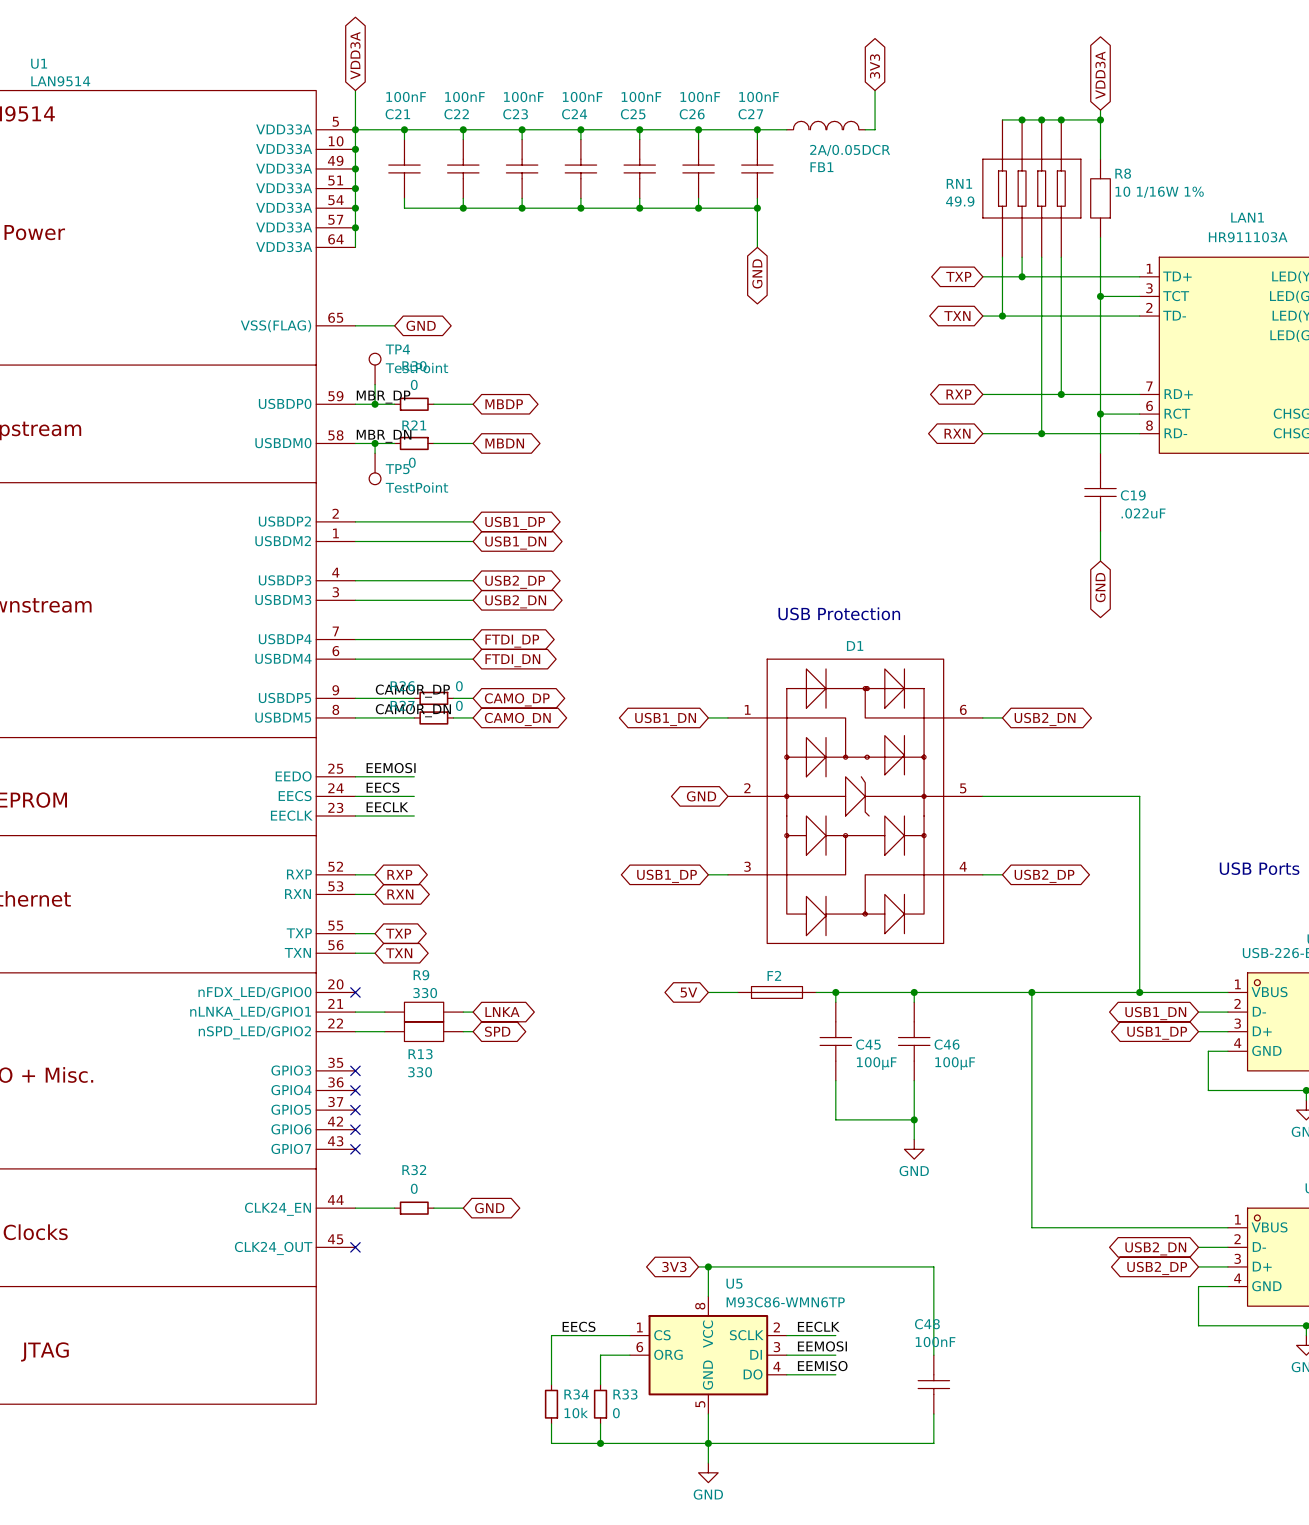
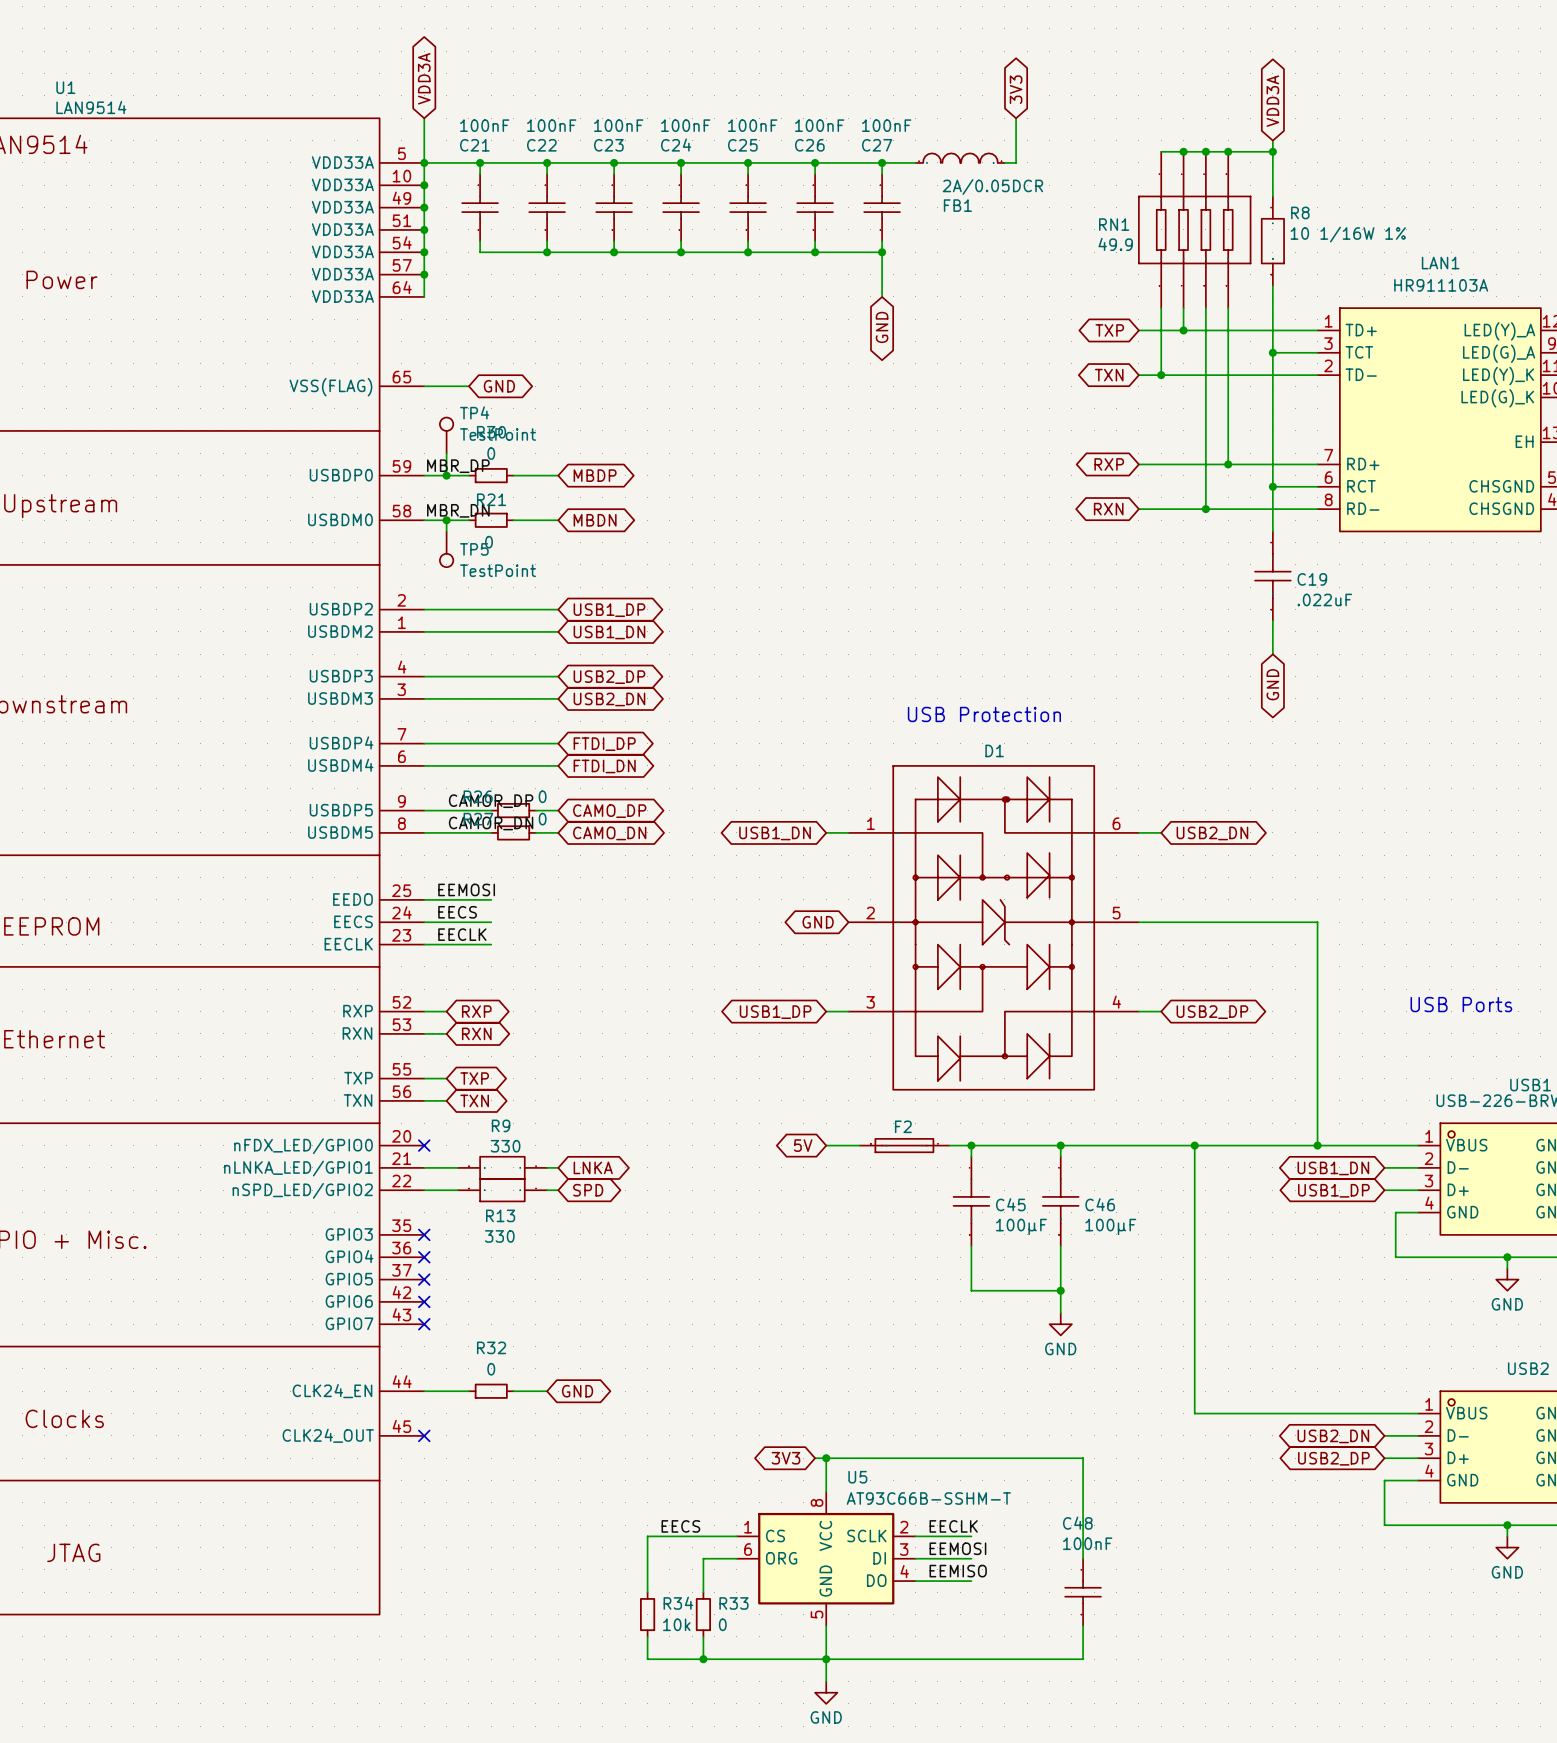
U5 value: M93C86-WMN6TP (785, 1302) -> AT93C66B-SSHM-T (928, 1498)

